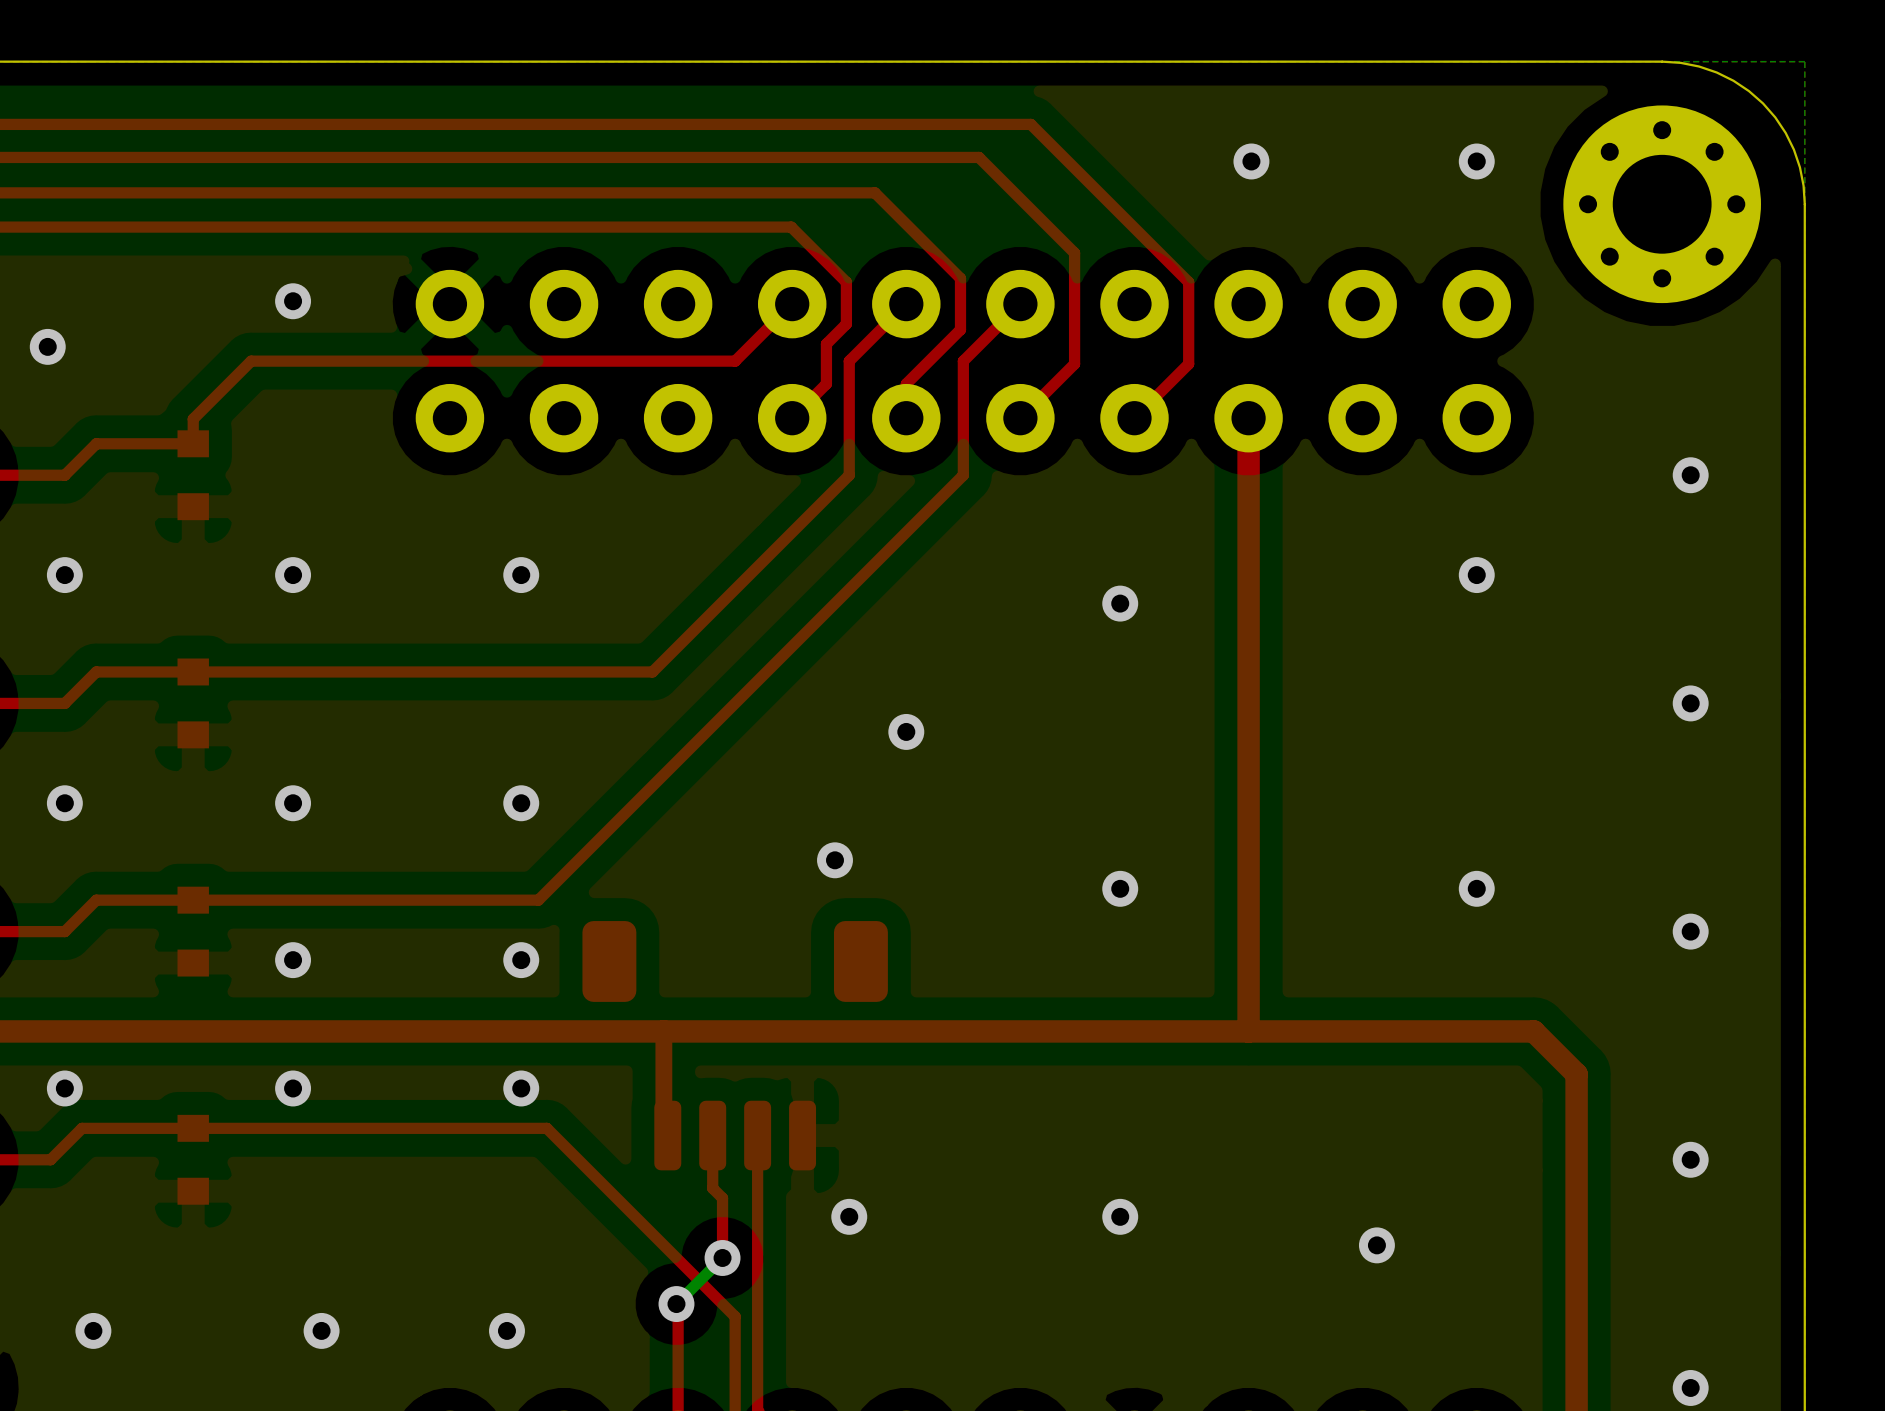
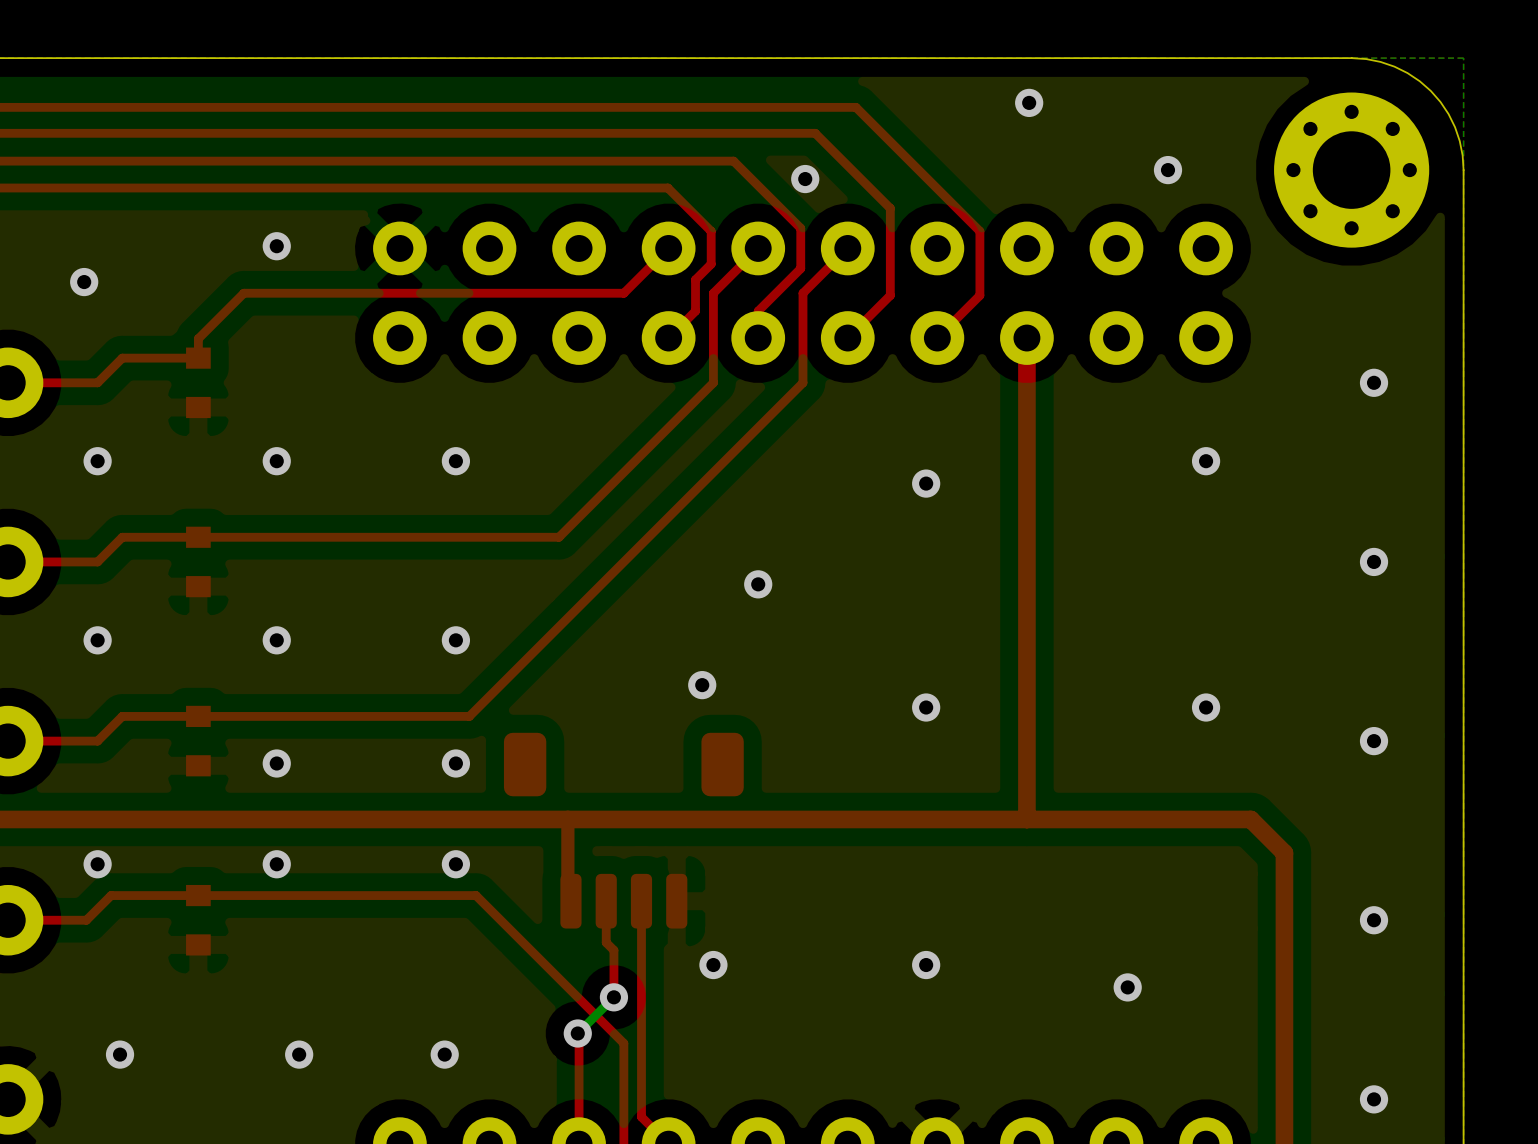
via position: (1251, 161) -> (1029, 102)
via position: (1476, 161) -> (1168, 170)
via: none -> (805, 179)

